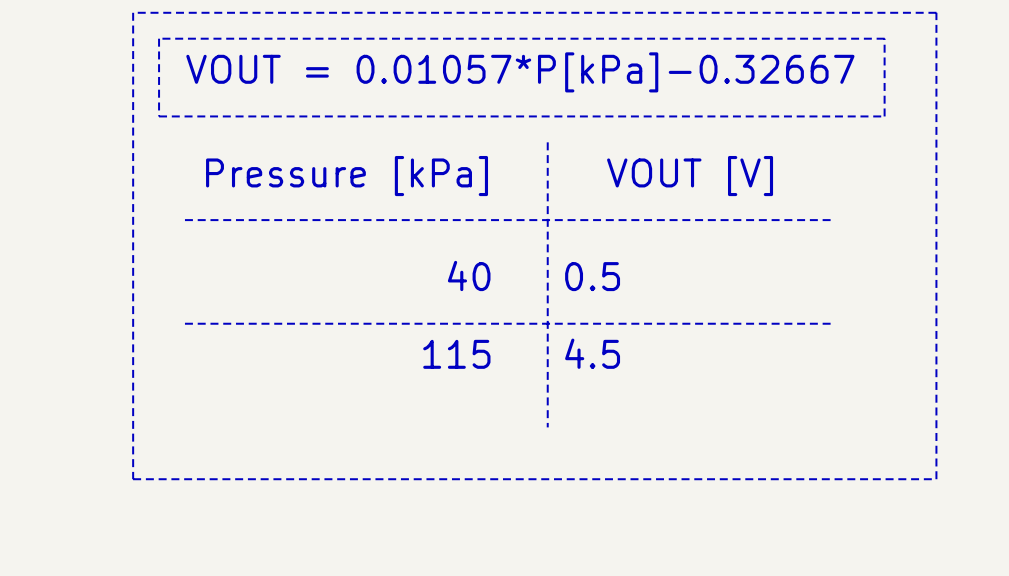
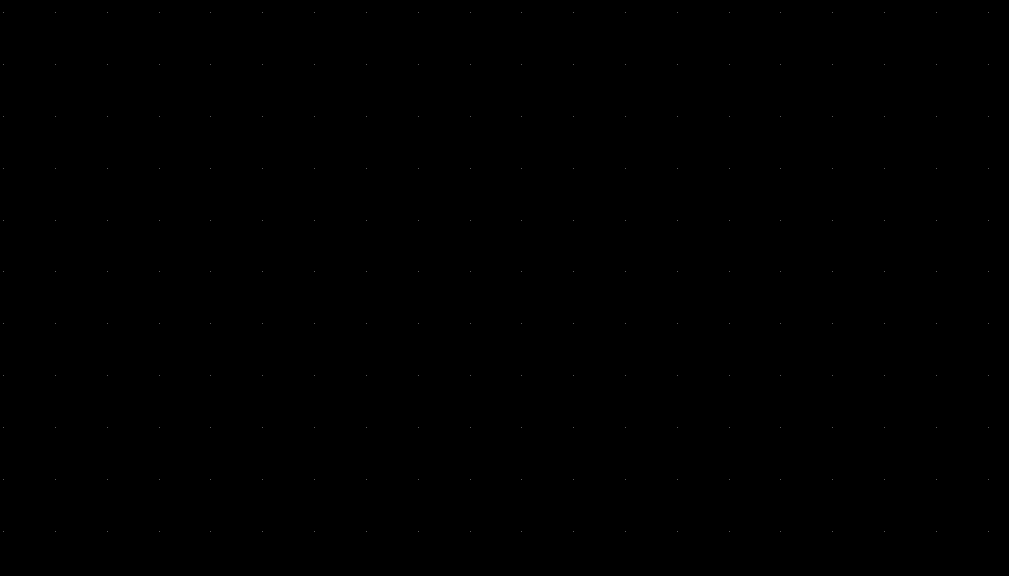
line: (133, 12) (936, 12) (936, 479) (133, 479) (133, 12) -> none
line: (159, 38) (159, 116) (884, 116) (884, 38) (159, 38) -> none
text: VOUT = 0.01057*P[kPa]-0.32667 (520, 72) -> none
line: (547, 142) (547, 427) -> none
text: Pressure [kPa] (347, 176) -> none
text: VOUT [V] (690, 176) -> none
line: (184, 220) (832, 220) -> none
text: 40 (469, 275) -> none
text: 0.5 (592, 276) -> none
line: (184, 323) (832, 323) -> none
text: 4.5 (592, 353) -> none
text: 115 (456, 354) -> none

